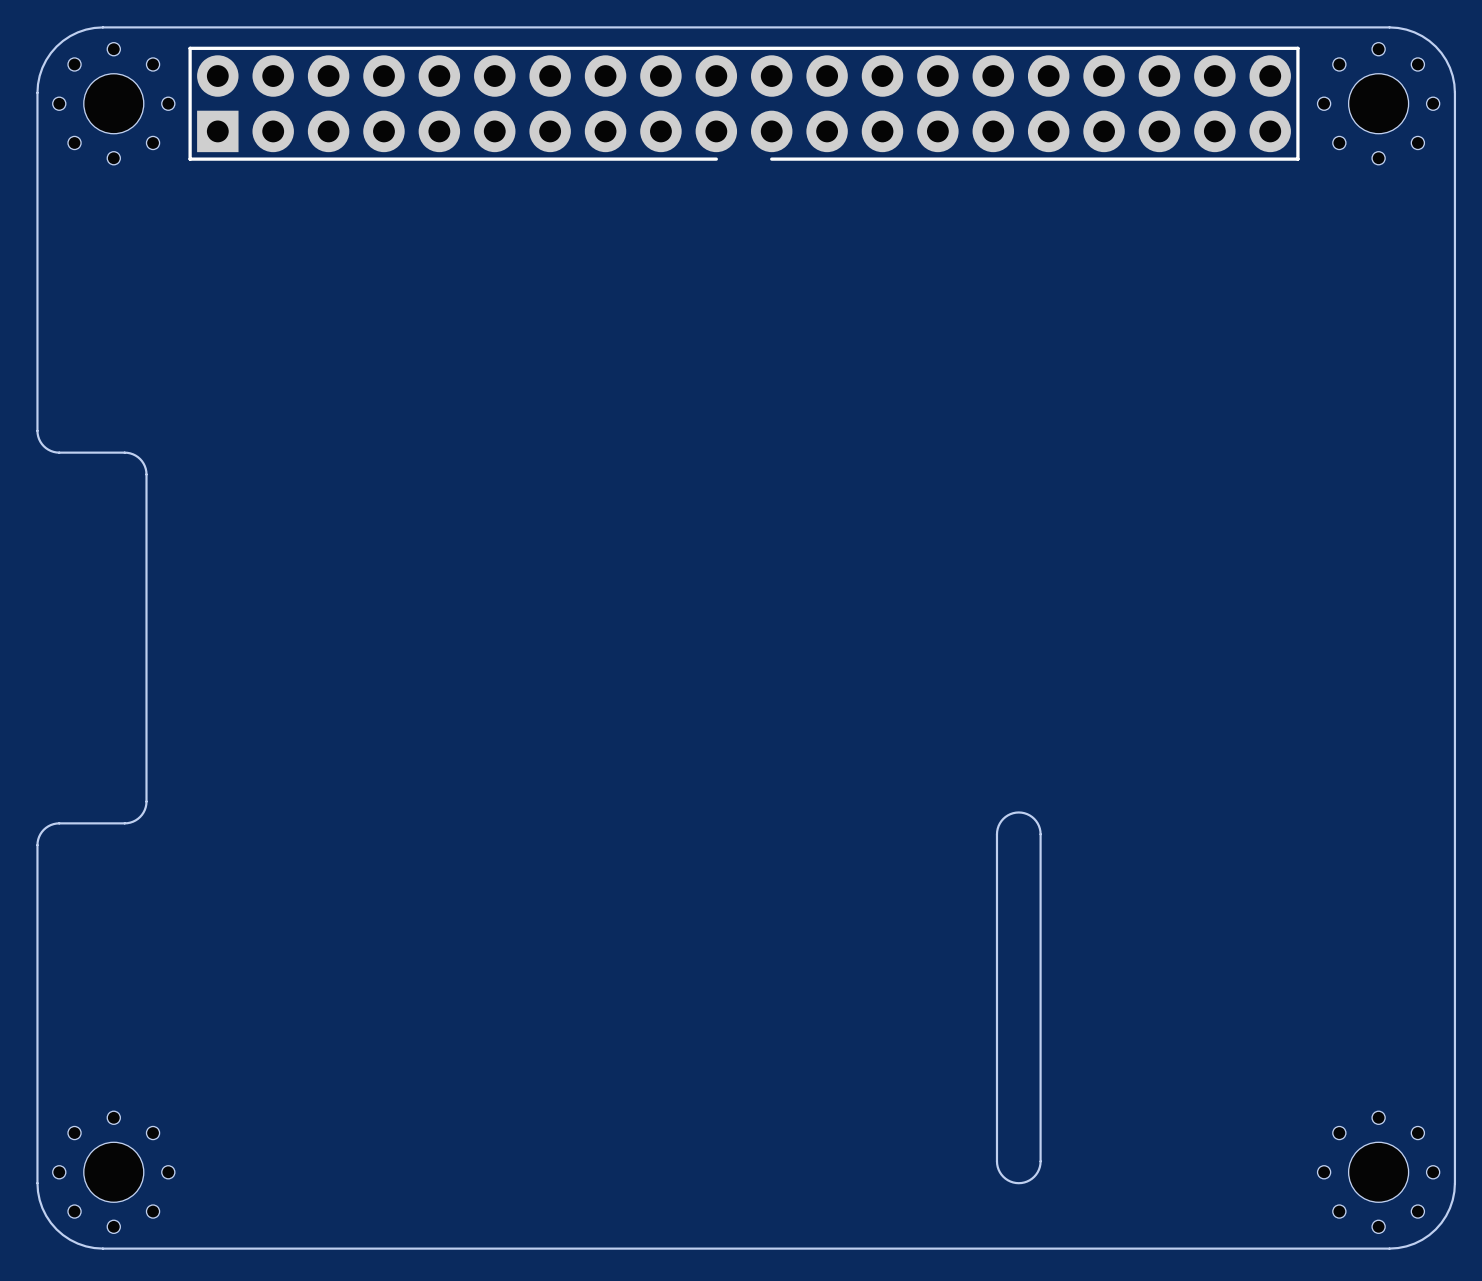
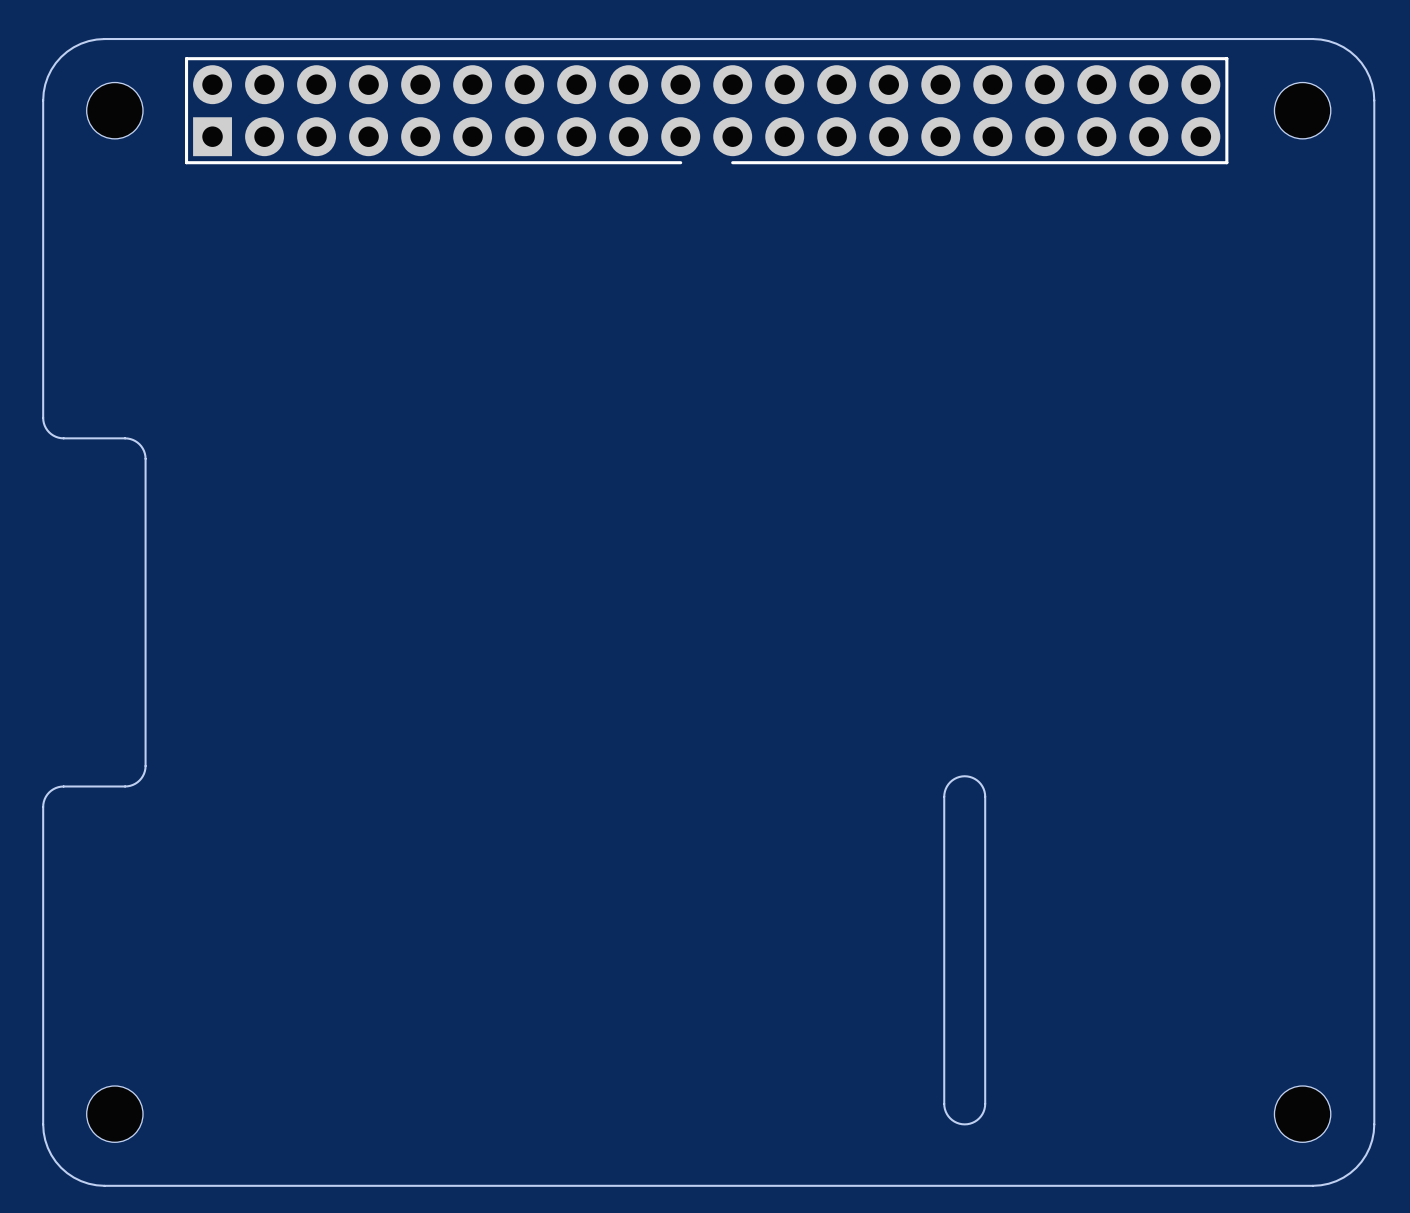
part footprint: [52, 42, 175, 165] -> [86, 82, 144, 139]
part footprint: [1317, 42, 1440, 165] -> [1274, 82, 1331, 139]
part footprint: [52, 1111, 175, 1234] -> [86, 1085, 144, 1143]
part footprint: [1317, 1111, 1440, 1234] -> [1274, 1085, 1331, 1143]

